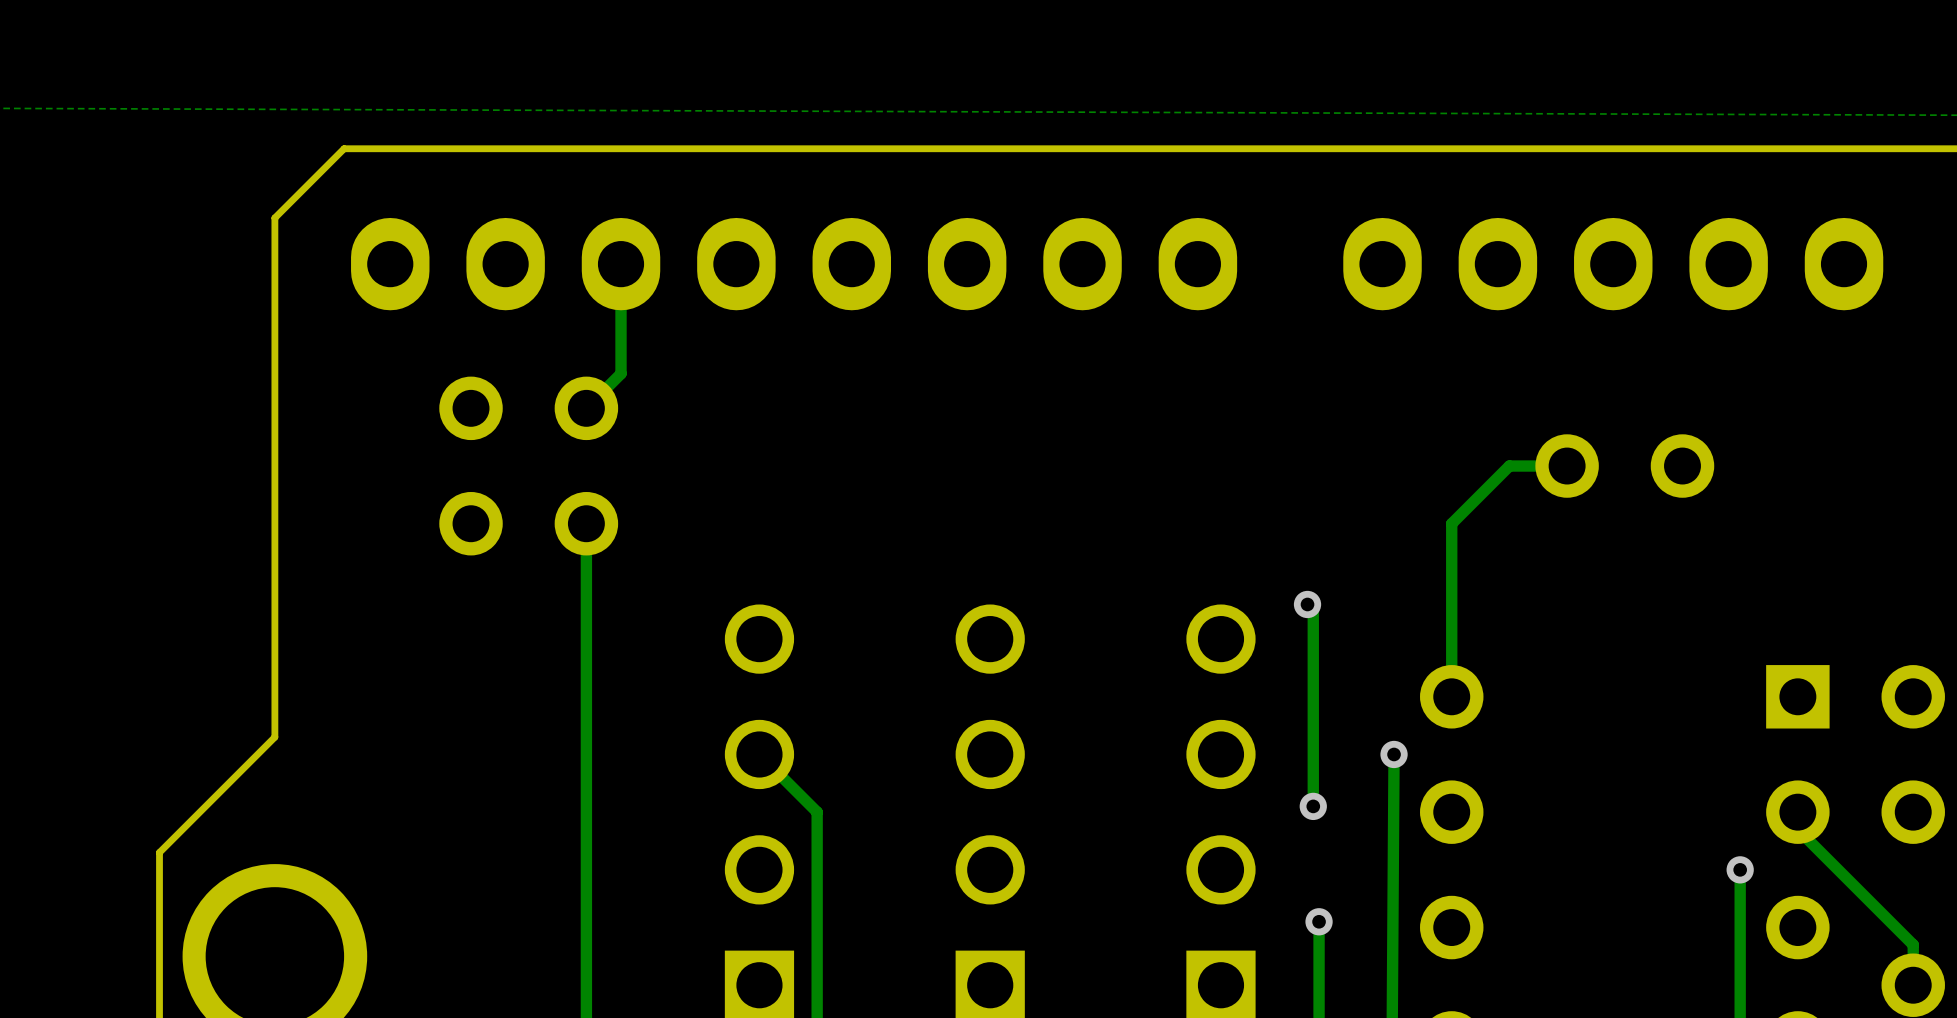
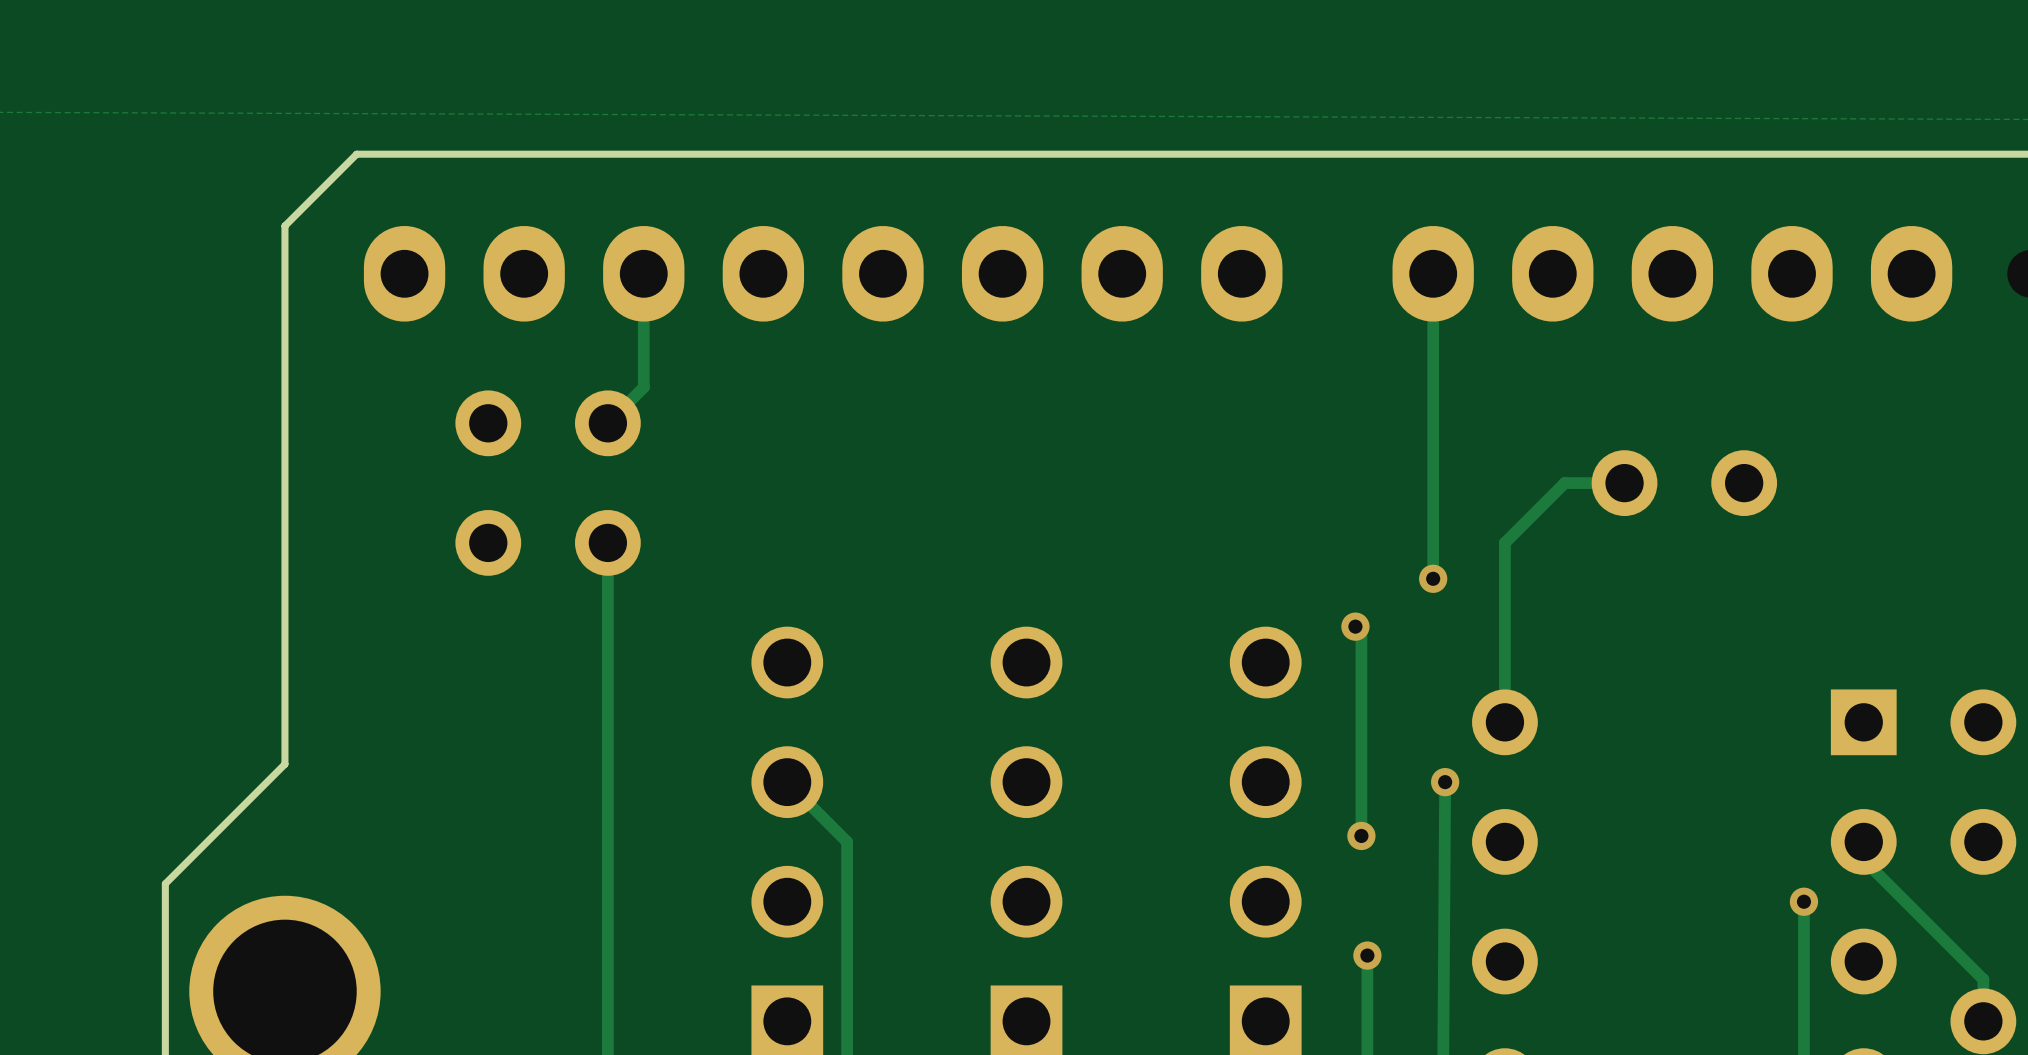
track: none -> (1433, 273) (1433, 578)
via: none -> (1433, 578)

